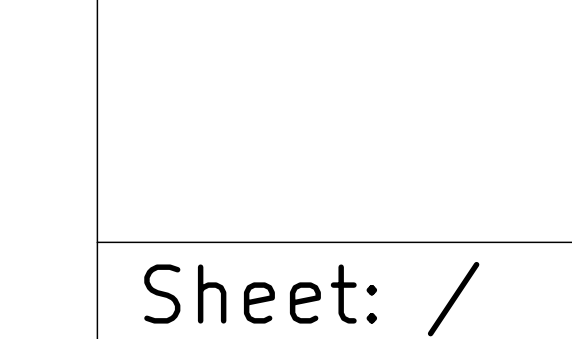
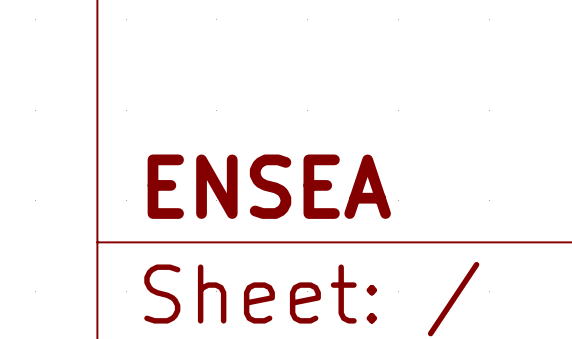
title block: none -> ENSEA (269, 186)

